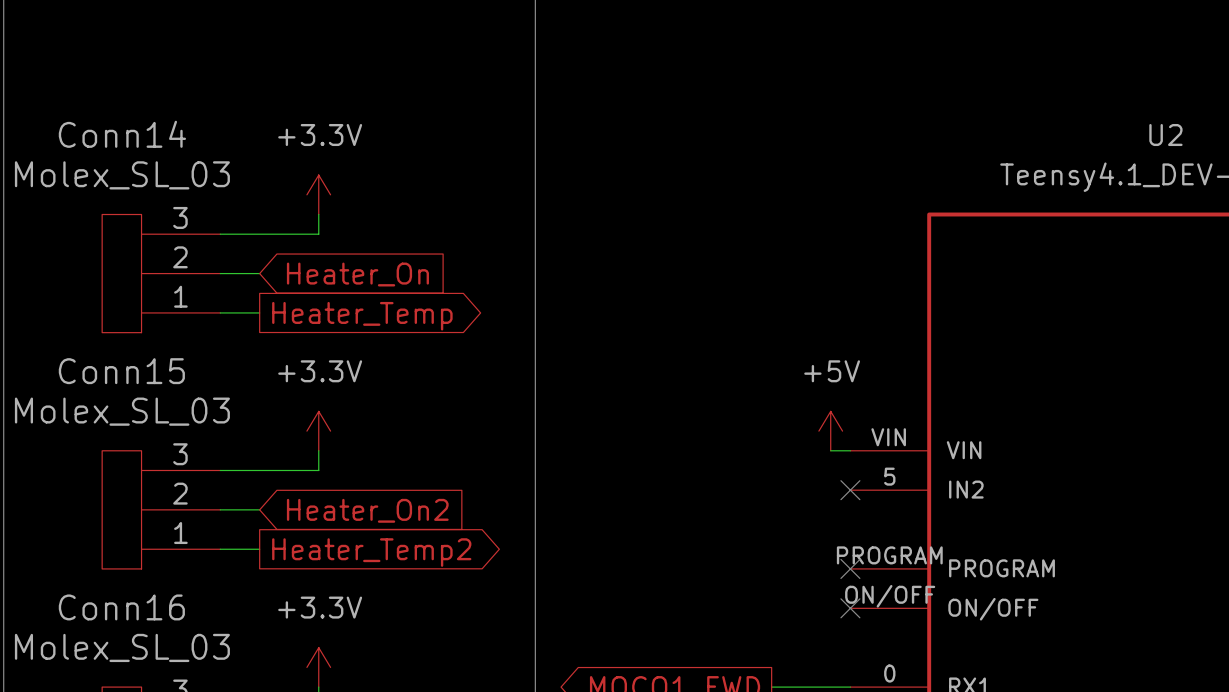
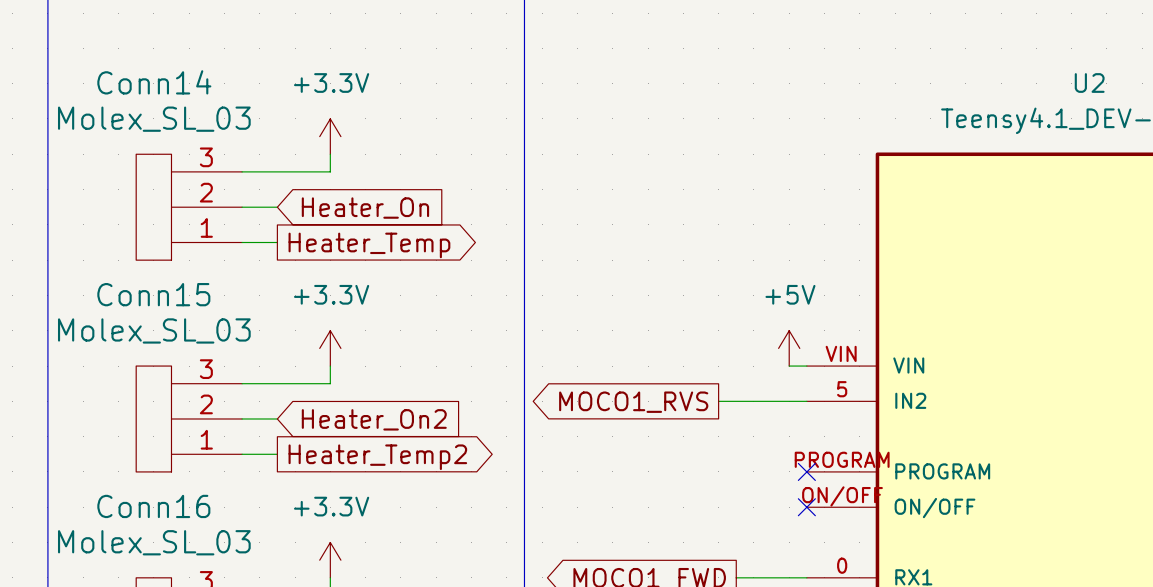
wire: none -> (718, 401) (806, 401)
no-connect mark: (850, 490) -> none
global label: none -> MOCO1_RVS (633, 402)

